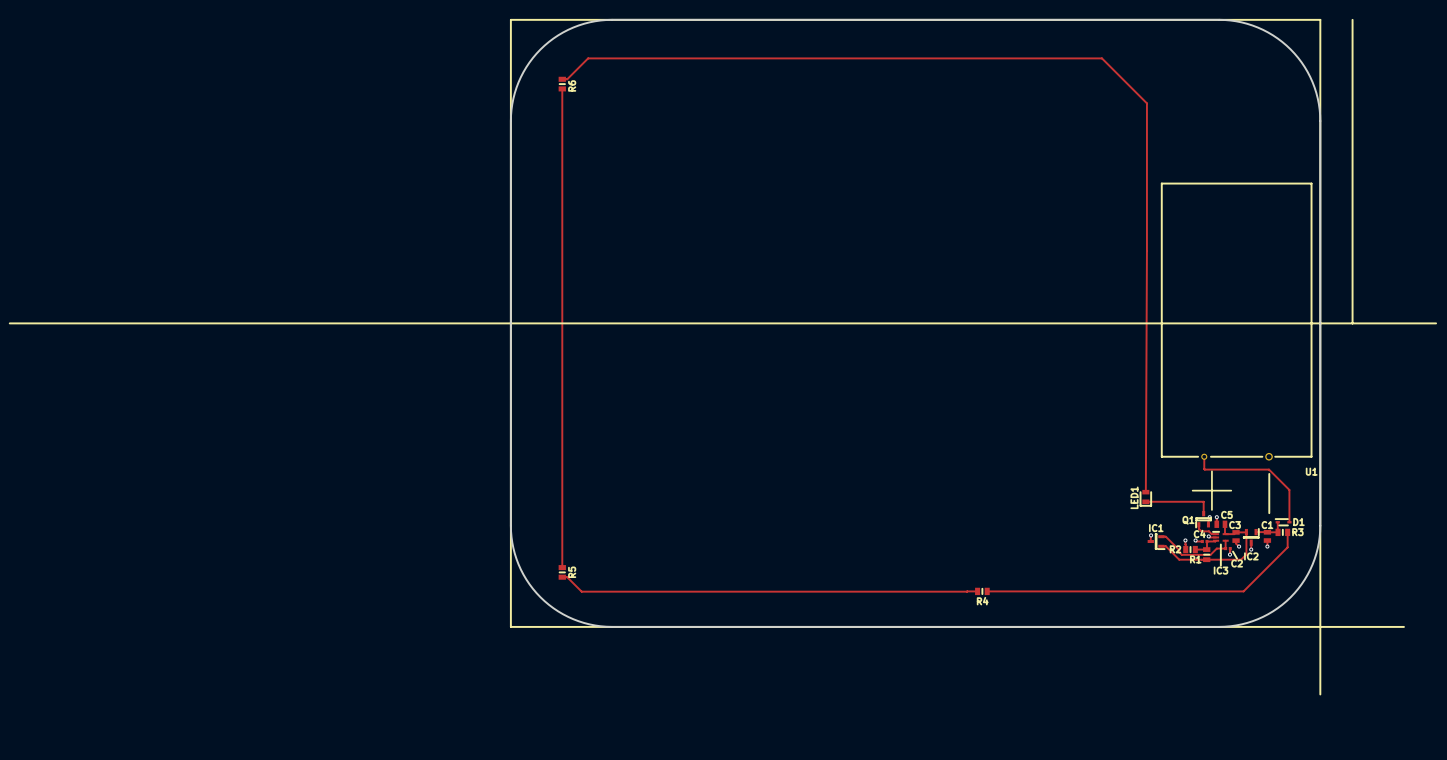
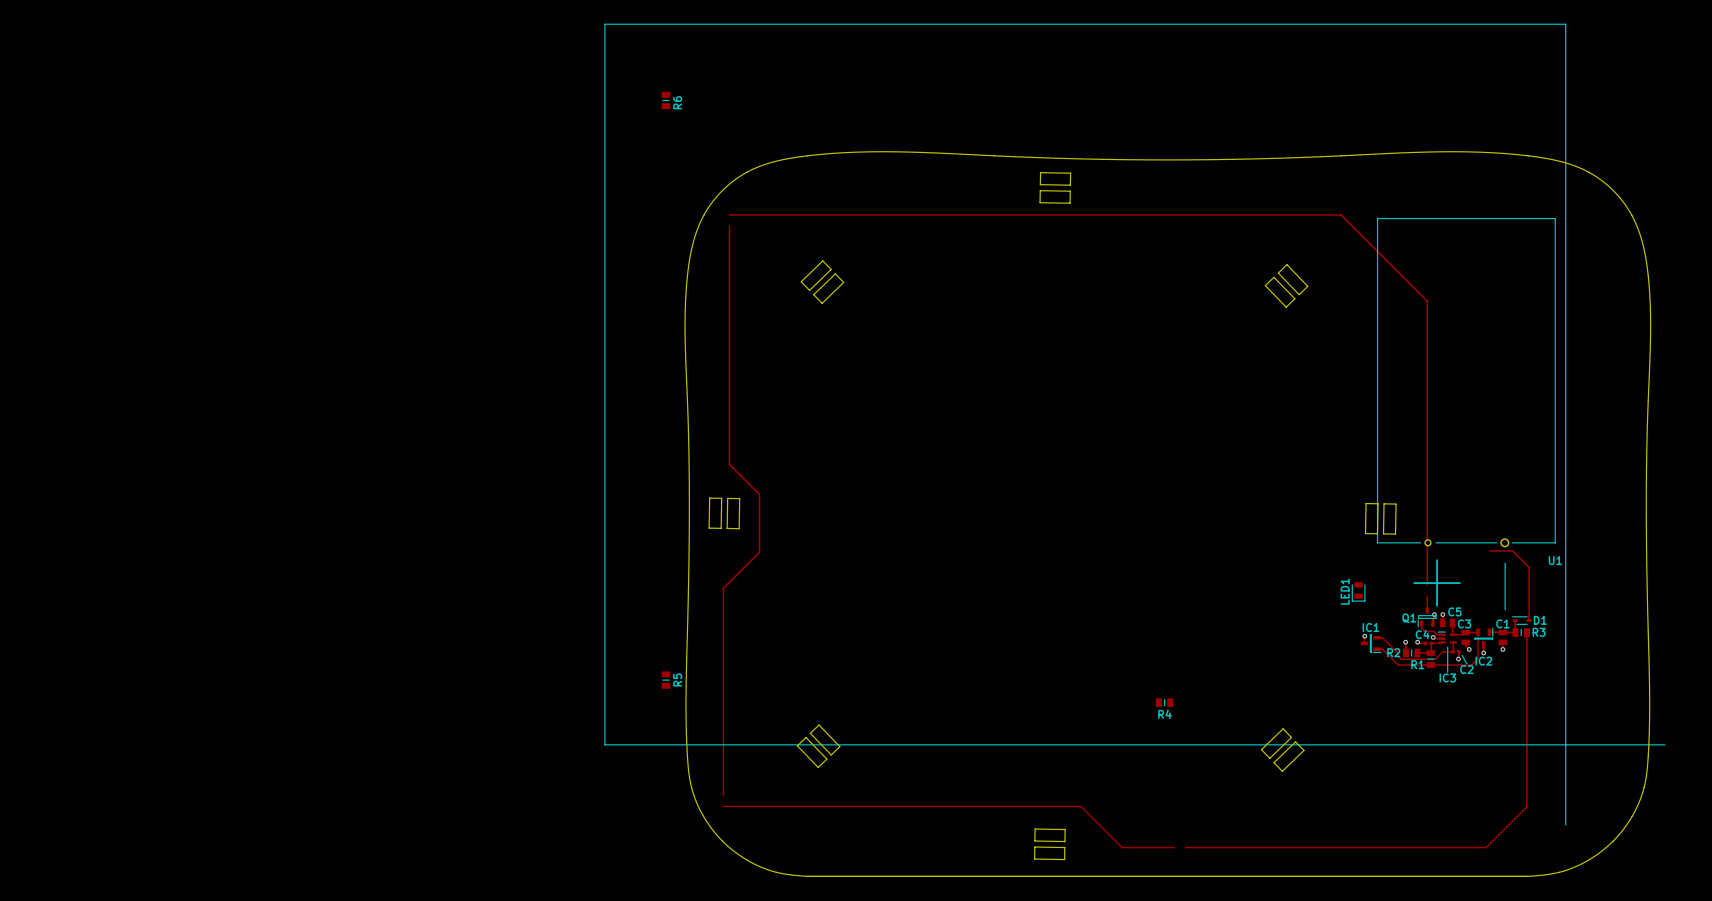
board edge: (612, 19) (1224, 19) (1257, 27) (1282, 41) (1298, 57) (1307, 72) (1316, 93) (1320, 115) (1320, 531) (1312, 564) (1298, 588) (1282, 604) (1263, 616) (1241, 624) (1219, 626) (606, 626) (578, 621) (548, 604) (536, 593) (523, 574) (514, 553) (511, 531) (511, 109) (514, 93) (523, 72) (544, 45) (573, 27) (595, 21) (612, 19) -> (807, 155) (780, 160) (757, 167) (740, 176) (722, 190) (707, 208) (698, 225) (691, 248) (687, 275) (685, 322) (689, 487) (686, 701) (687, 762) (691, 787) (699, 809) (713, 830) (729, 847) (747, 860) (765, 868) (782, 873) (807, 876) (1528, 876) (1555, 873) (1577, 865) (1601, 851) (1619, 833) (1632, 816) (1640, 798) (1645, 779) (1648, 756) (1649, 693) (1646, 487) (1650, 314) (1647, 268) (1639, 233) (1625, 205) (1604, 182) (1585, 170) (1559, 161) (1528, 155) (1481, 152) (1422, 152) (1189, 159) (1059, 158) (889, 151) (807, 155)
line: (1352, 19) (1352, 323) -> none
track: (562, 79) (567, 79) (588, 58) (1101, 58) (1146, 103) (1145, 492) -> none
track: (562, 88) (562, 567) -> none
board edge: none -> (1040, 172) (1040, 184) (1070, 185) (1070, 173) (1040, 172)
board edge: none -> (1040, 190) (1040, 202) (1070, 203) (1070, 191) (1040, 190)
track: none -> (729, 214) (1341, 214) (1427, 301) (1427, 584)
track: none -> (729, 226) (729, 464) (759, 494) (759, 552) (723, 588) (723, 795)
board edge: none -> (822, 260) (831, 269) (809, 290) (801, 281) (822, 260)
board edge: none -> (1286, 264) (1278, 273) (1299, 294) (1307, 286) (1286, 264)
board edge: none -> (835, 273) (843, 282) (822, 303) (813, 294) (835, 273)
board edge: none -> (1273, 277) (1265, 285) (1286, 307) (1294, 298) (1273, 277)
line: (9, 323) (1436, 323) -> none
board edge: none -> (709, 498) (721, 498) (721, 528) (709, 528) (709, 498)
board edge: none -> (727, 498) (739, 498) (739, 528) (727, 528) (727, 498)
board edge: none -> (1366, 503) (1378, 503) (1377, 533) (1365, 533) (1366, 503)
board edge: none -> (1384, 503) (1396, 504) (1395, 534) (1383, 533) (1384, 503)
track: (1204, 456) (1204, 469) (1269, 469) (1289, 489) -> (1489, 550) (1512, 550) (1529, 567) (1529, 582)
track: (1145, 501) (1203, 501) -> none
track: (1287, 547) (1243, 591) (987, 591) -> (1526, 650) (1526, 806) (1486, 847) (1185, 847)
track: (562, 577) (567, 577) (581, 591) (977, 591) -> none
board edge: none -> (818, 725) (839, 746) (831, 754) (810, 733) (818, 725)
board edge: none -> (1283, 728) (1291, 737) (1269, 758) (1261, 749) (1283, 728)
board edge: none -> (806, 737) (797, 745) (818, 767) (826, 759) (806, 737)
board edge: none -> (1295, 741) (1303, 750) (1282, 771) (1274, 762) (1295, 741)
track: none -> (723, 806) (1081, 806) (1122, 847) (1174, 847)
board edge: none -> (1035, 829) (1065, 829) (1064, 841) (1034, 841) (1035, 829)
board edge: none -> (1034, 847) (1034, 859) (1064, 859) (1064, 847) (1034, 847)

